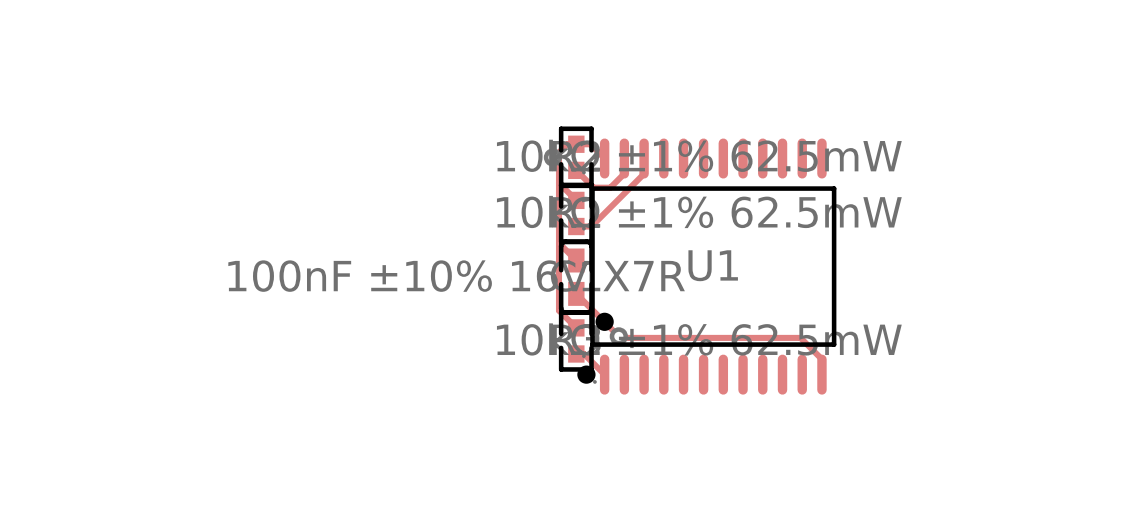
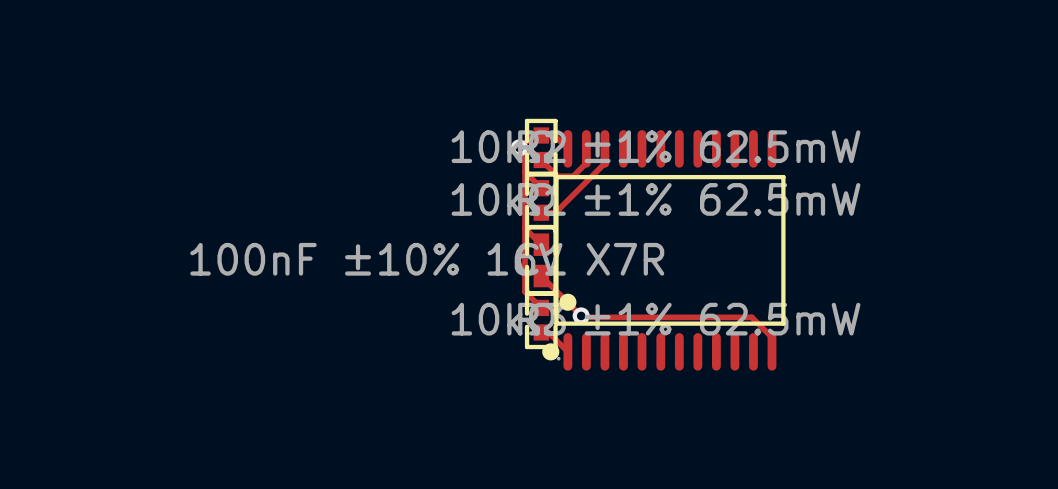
U1 name: U1 (713, 265) -> none

